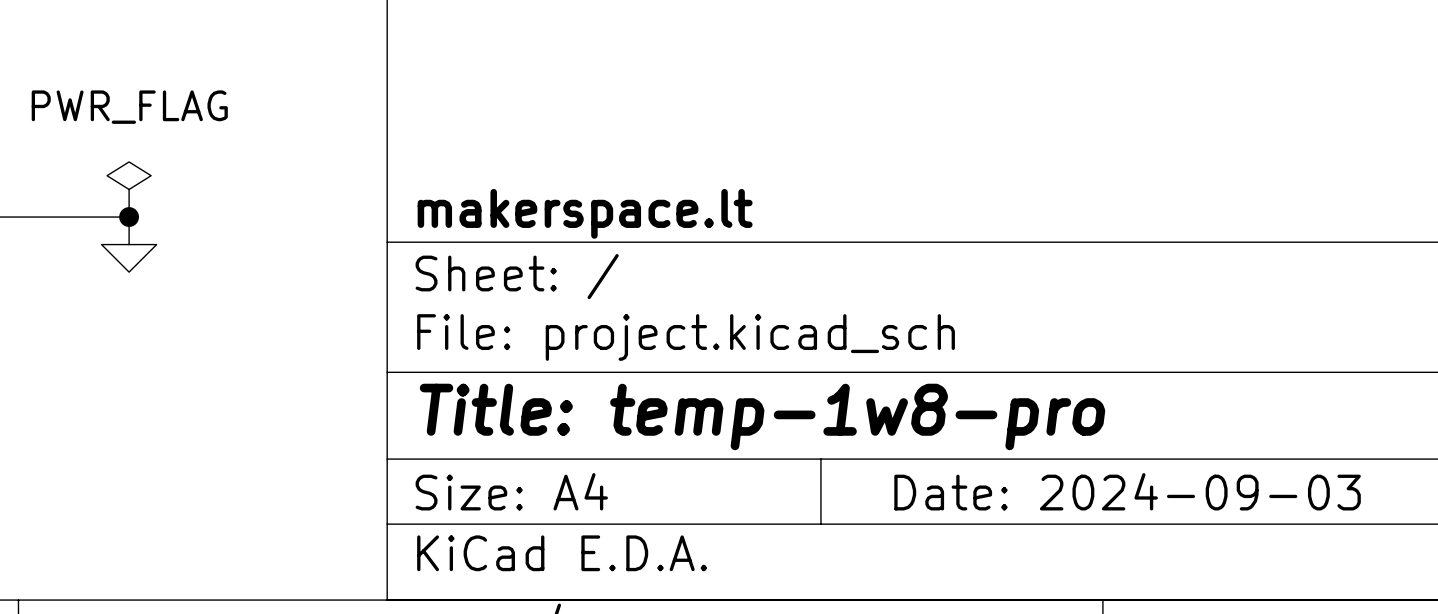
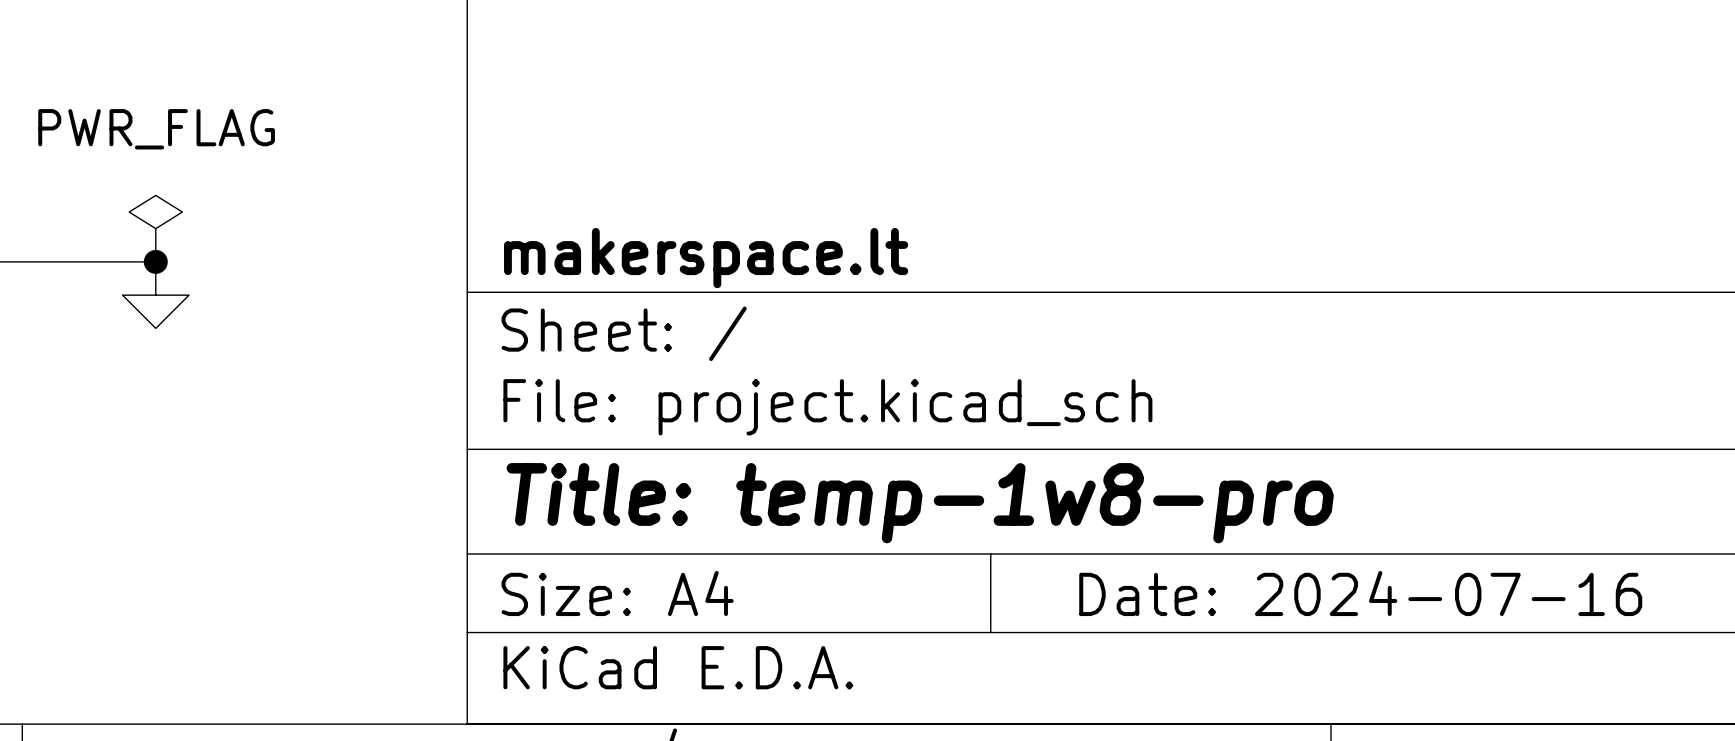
title block: Date: 2024-09-03 (1127, 491) -> Date: 2024-07-16 (1360, 593)

